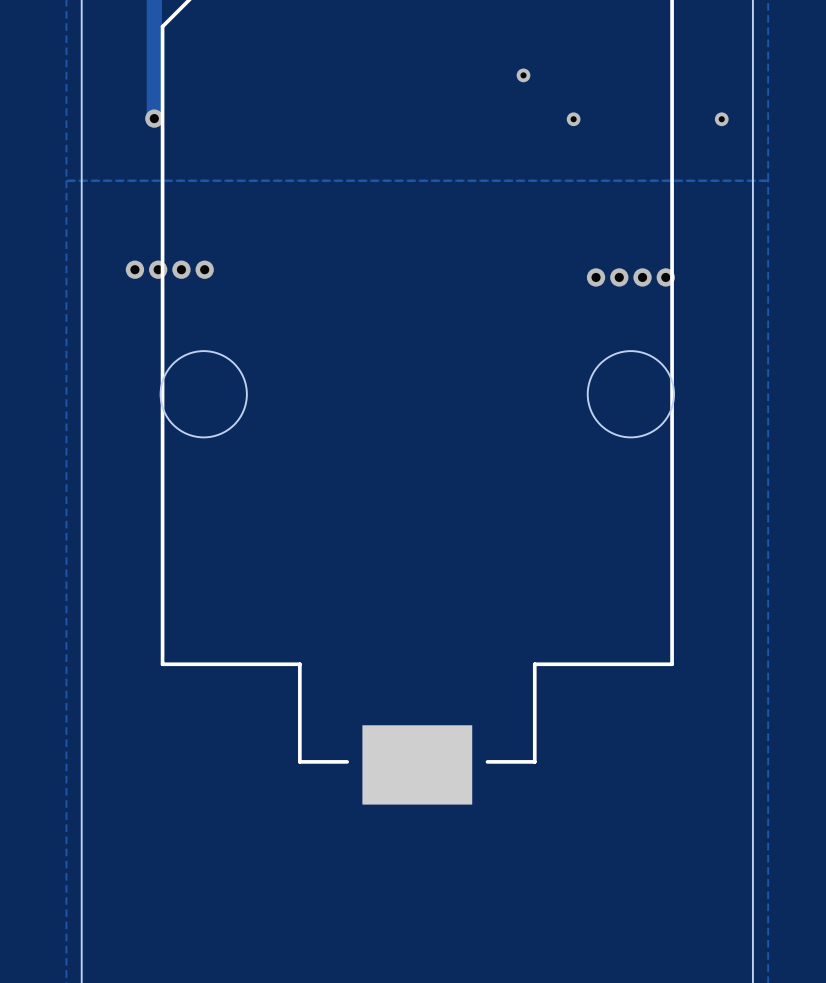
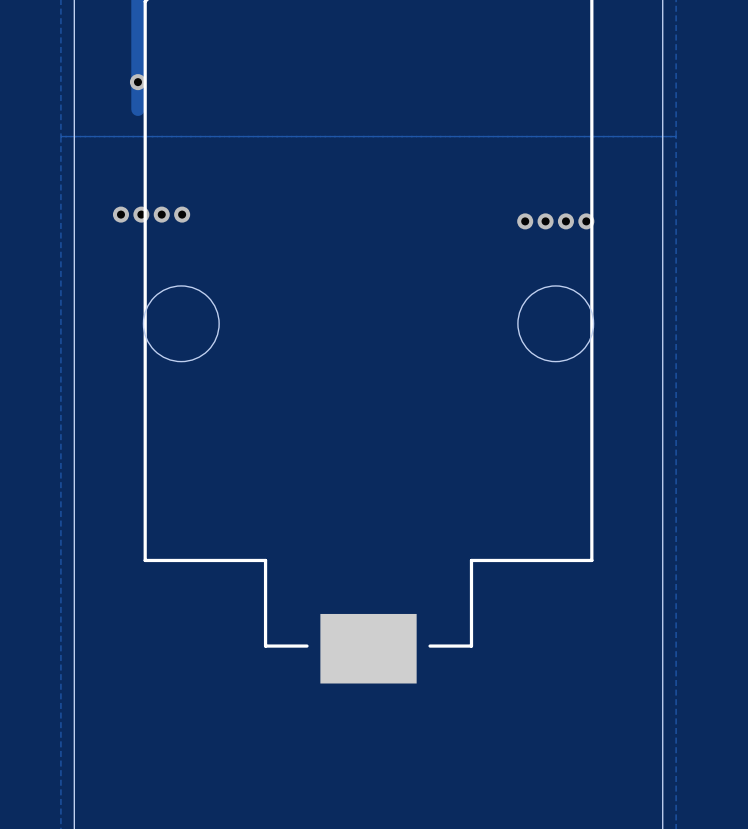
via: (523, 75) -> none
track: none -> (137, 82) (137, 109)
via: (573, 119) -> none
via: (721, 119) -> none

